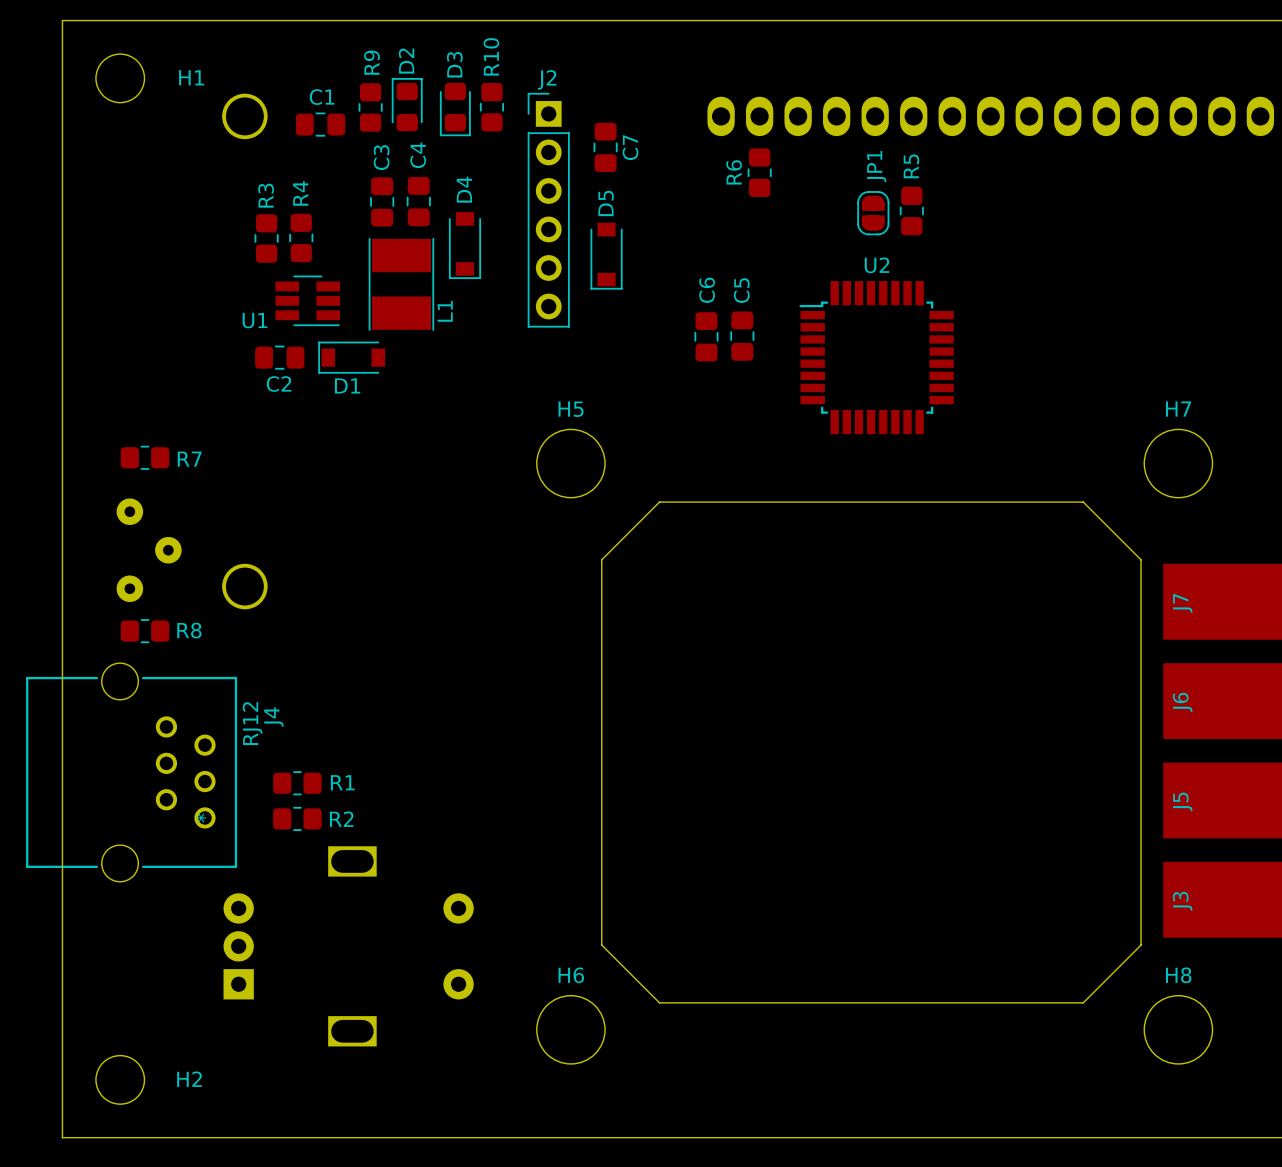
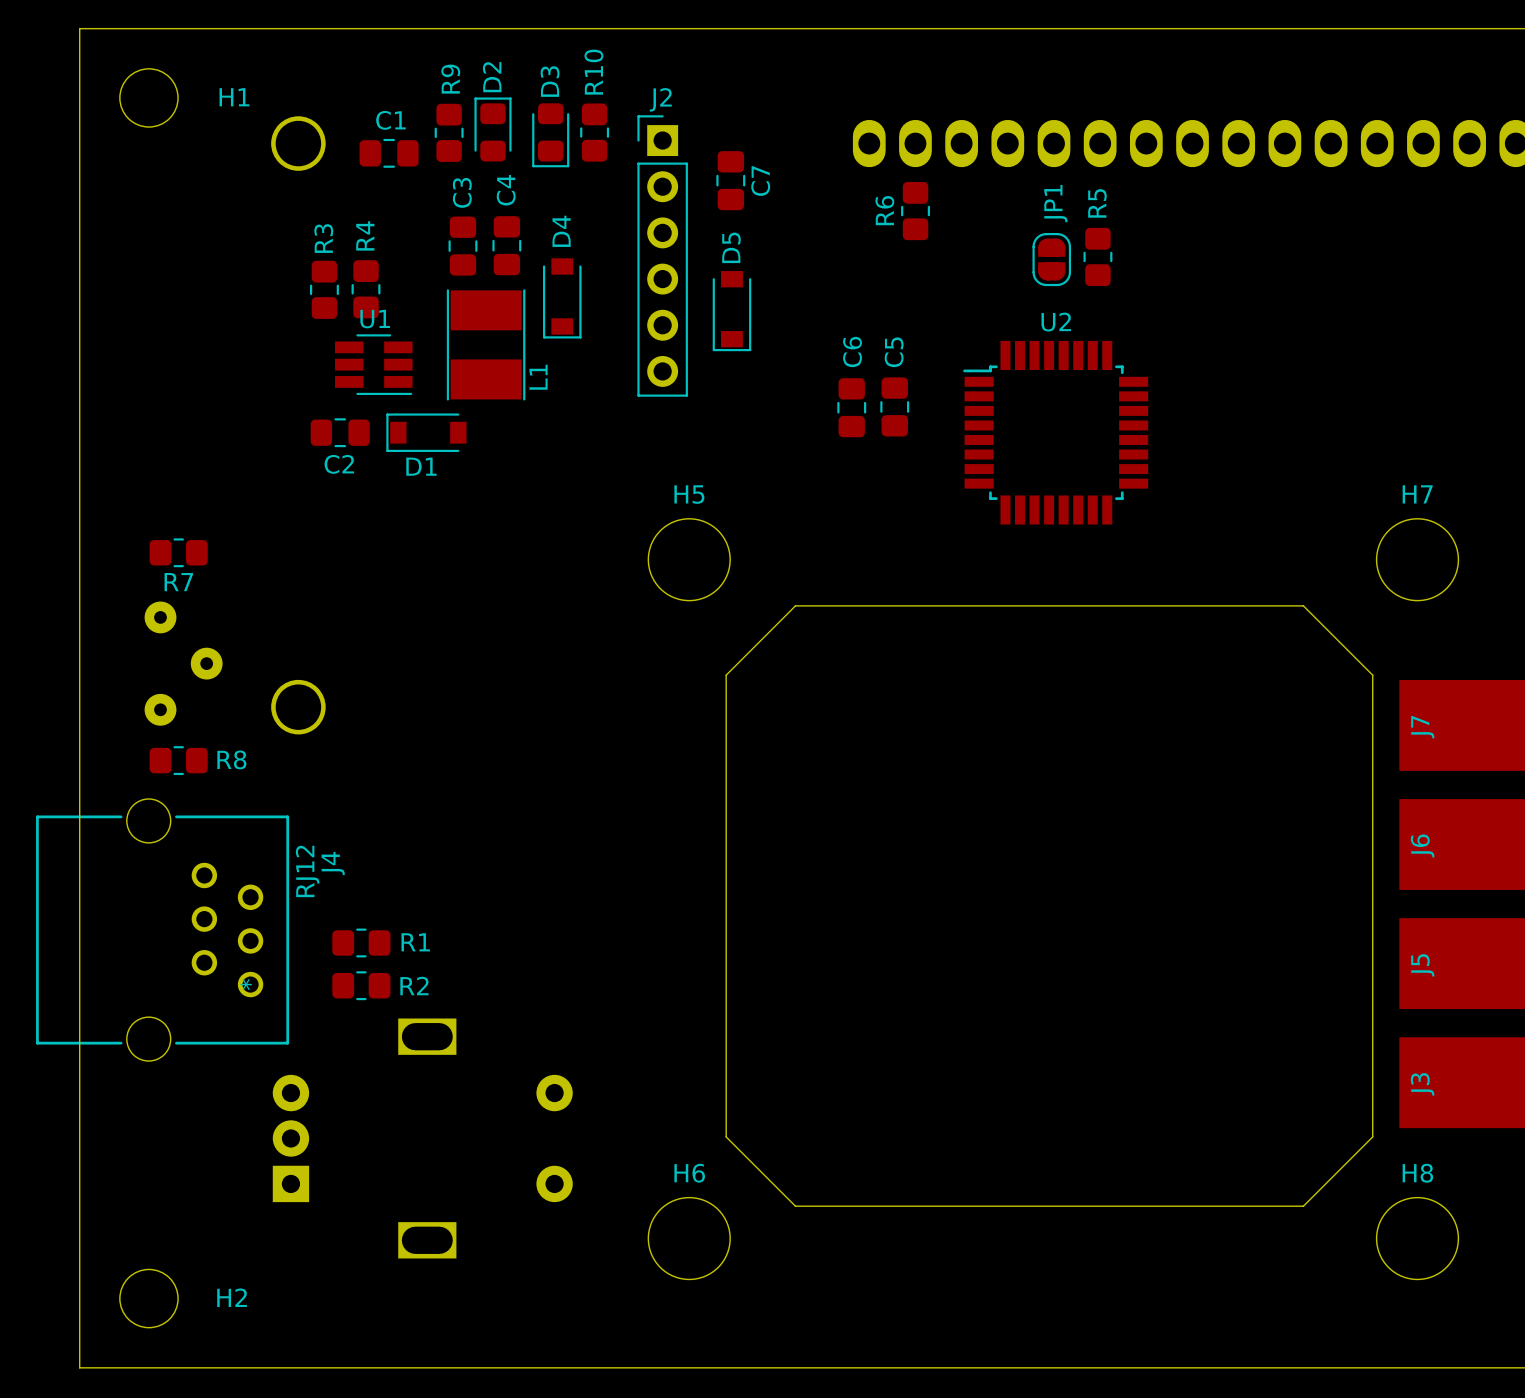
U1 name position: U1 (255, 320) -> U1 (375, 319)
R7 name position: R7 (189, 459) -> R7 (178, 582)

